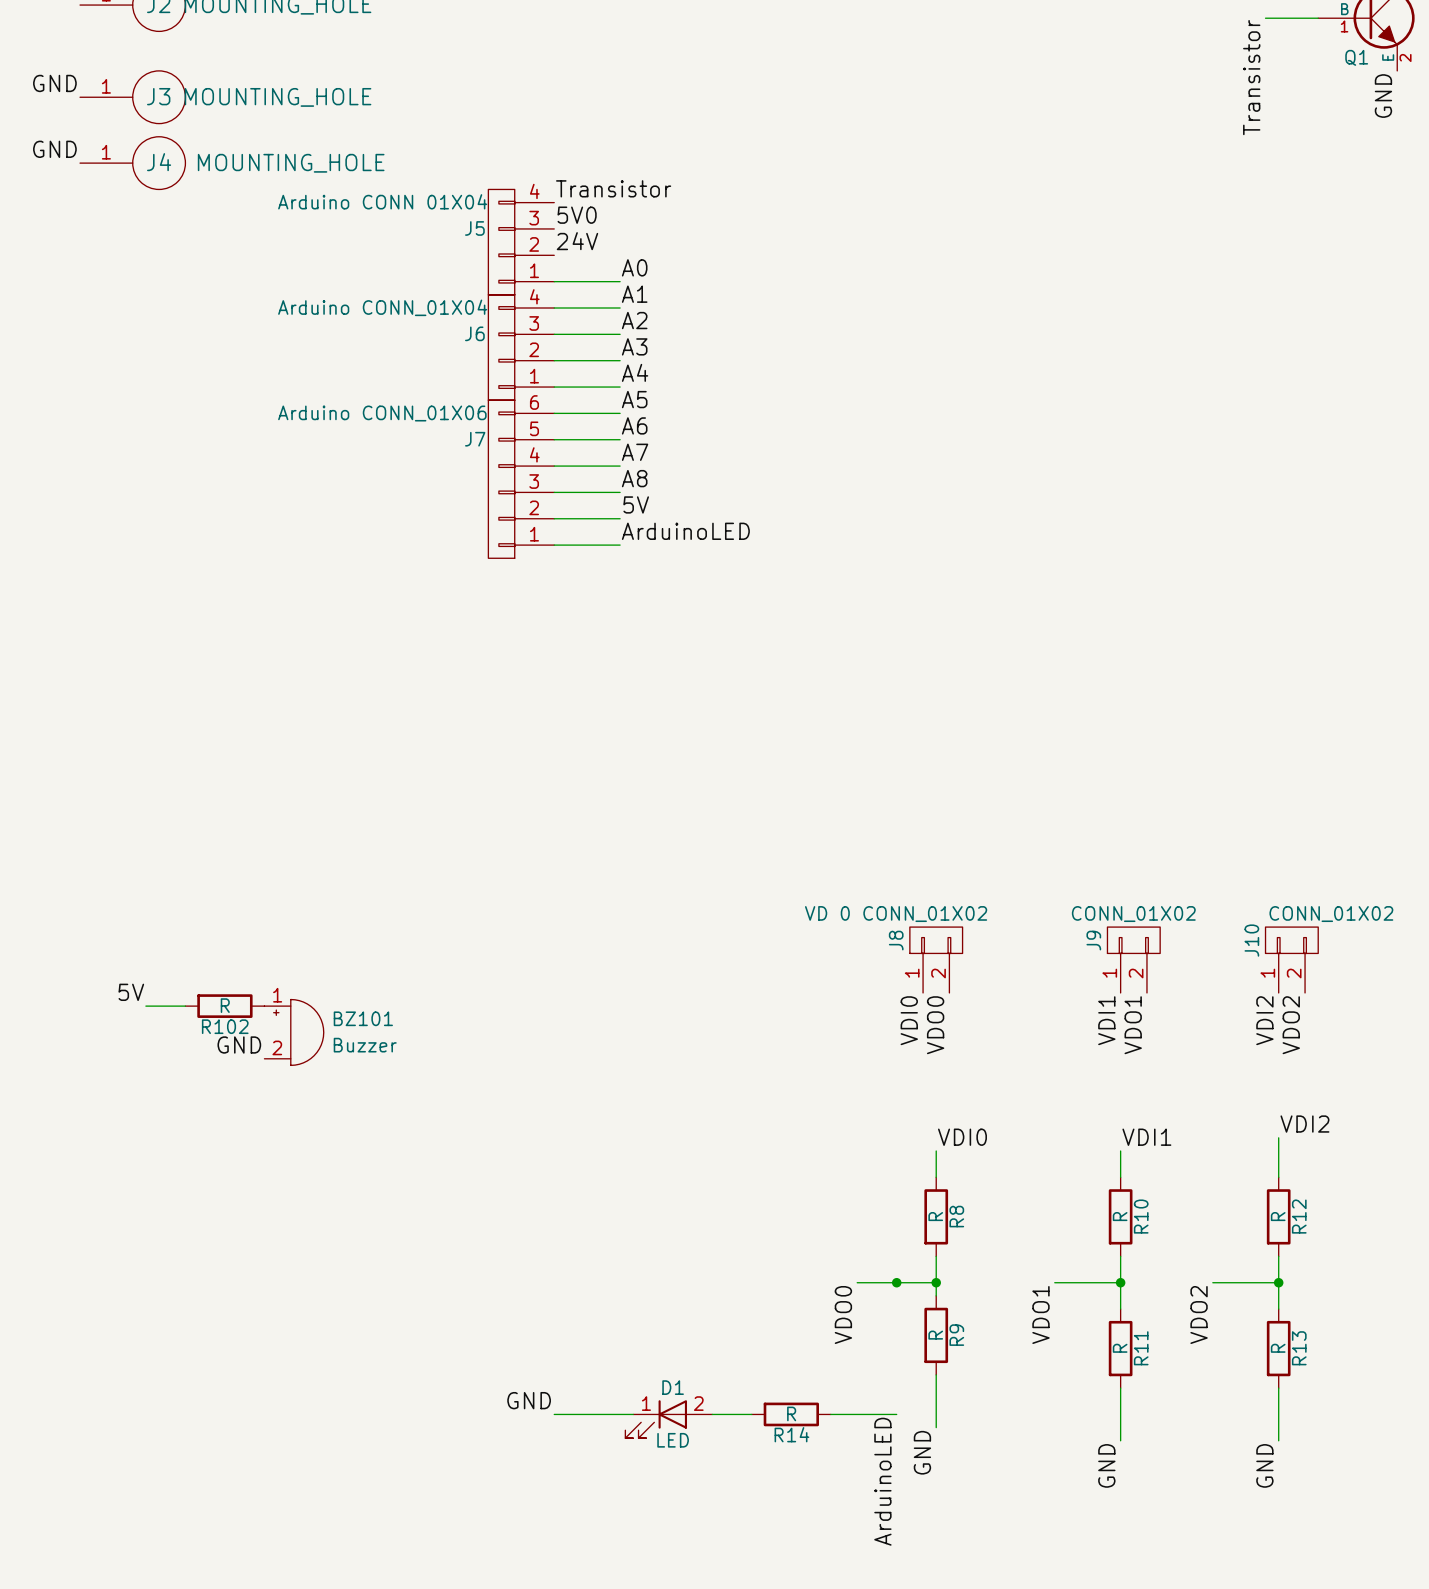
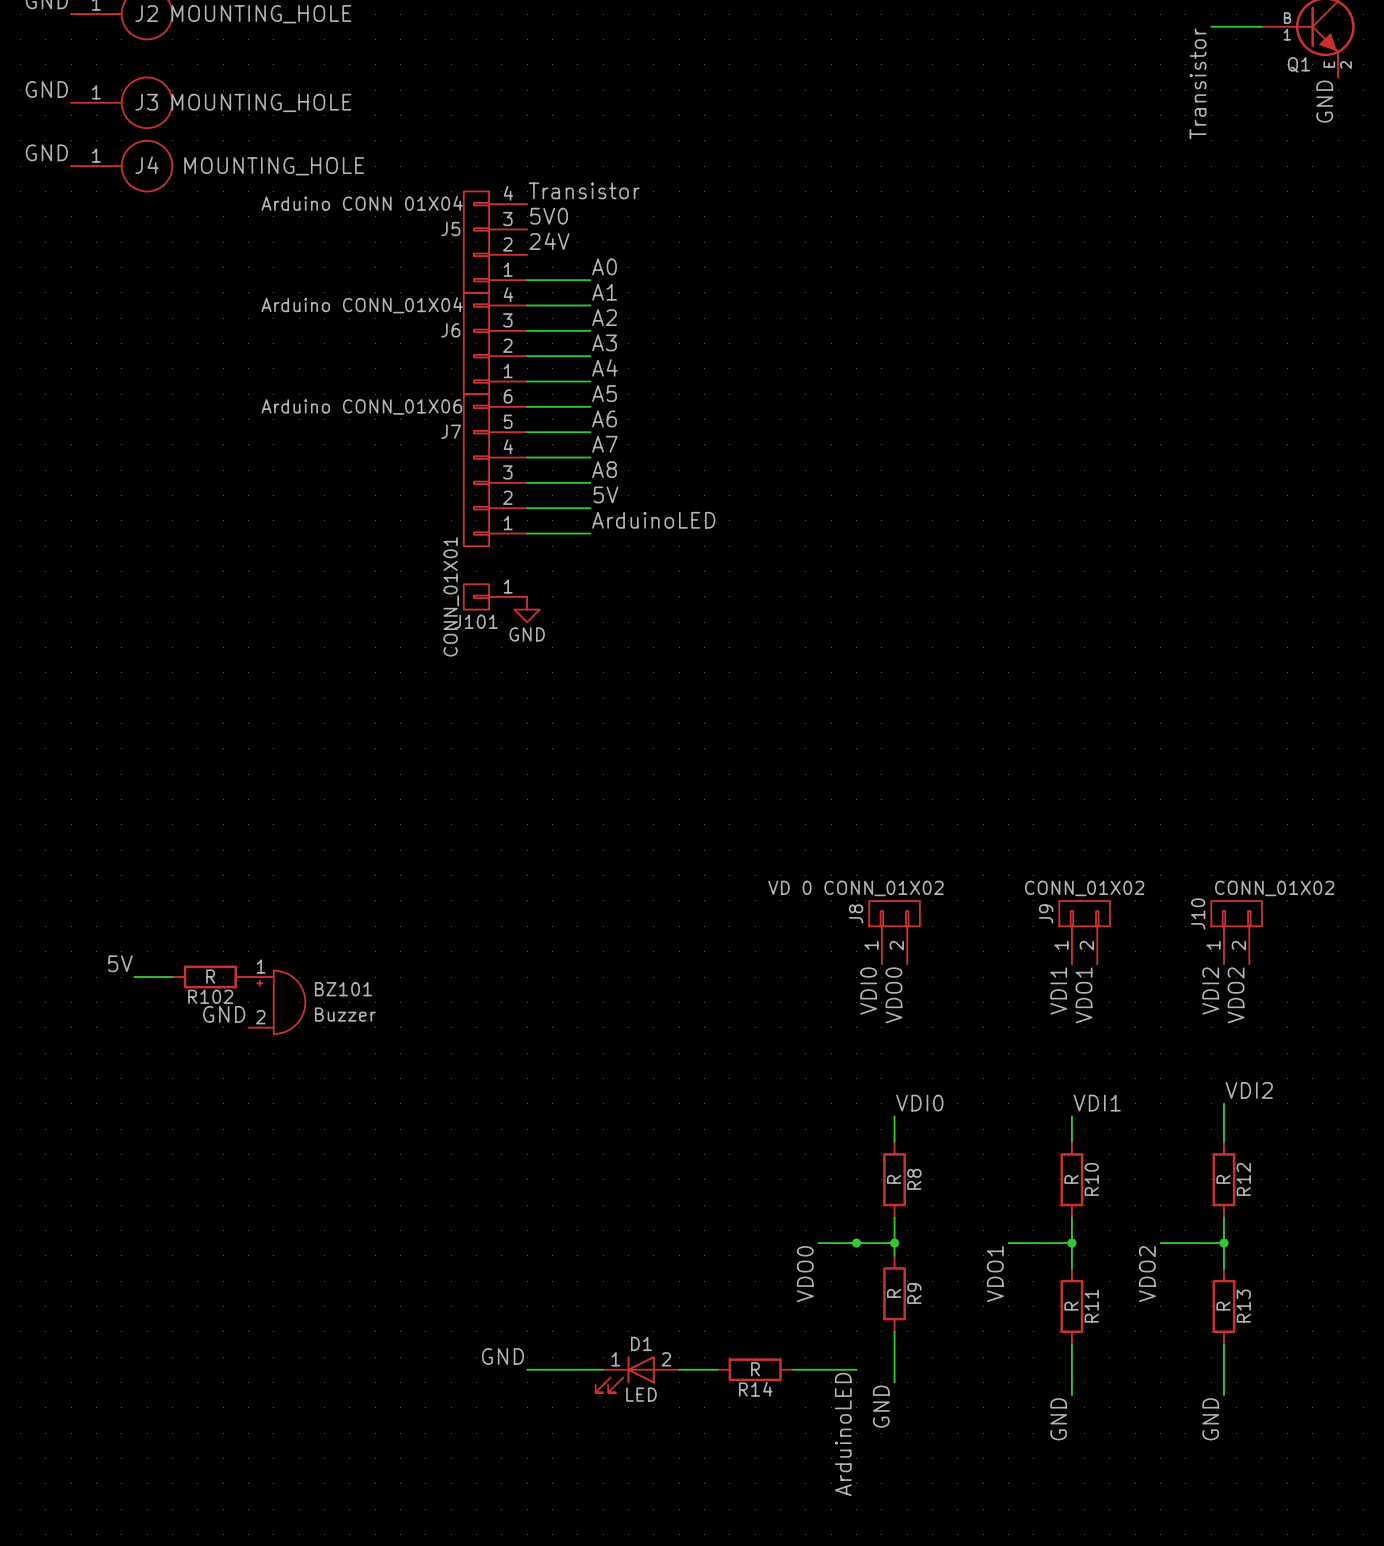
J101: none -> CONN_01X01 (495, 596)
power symbol: none -> GND (527, 609)

